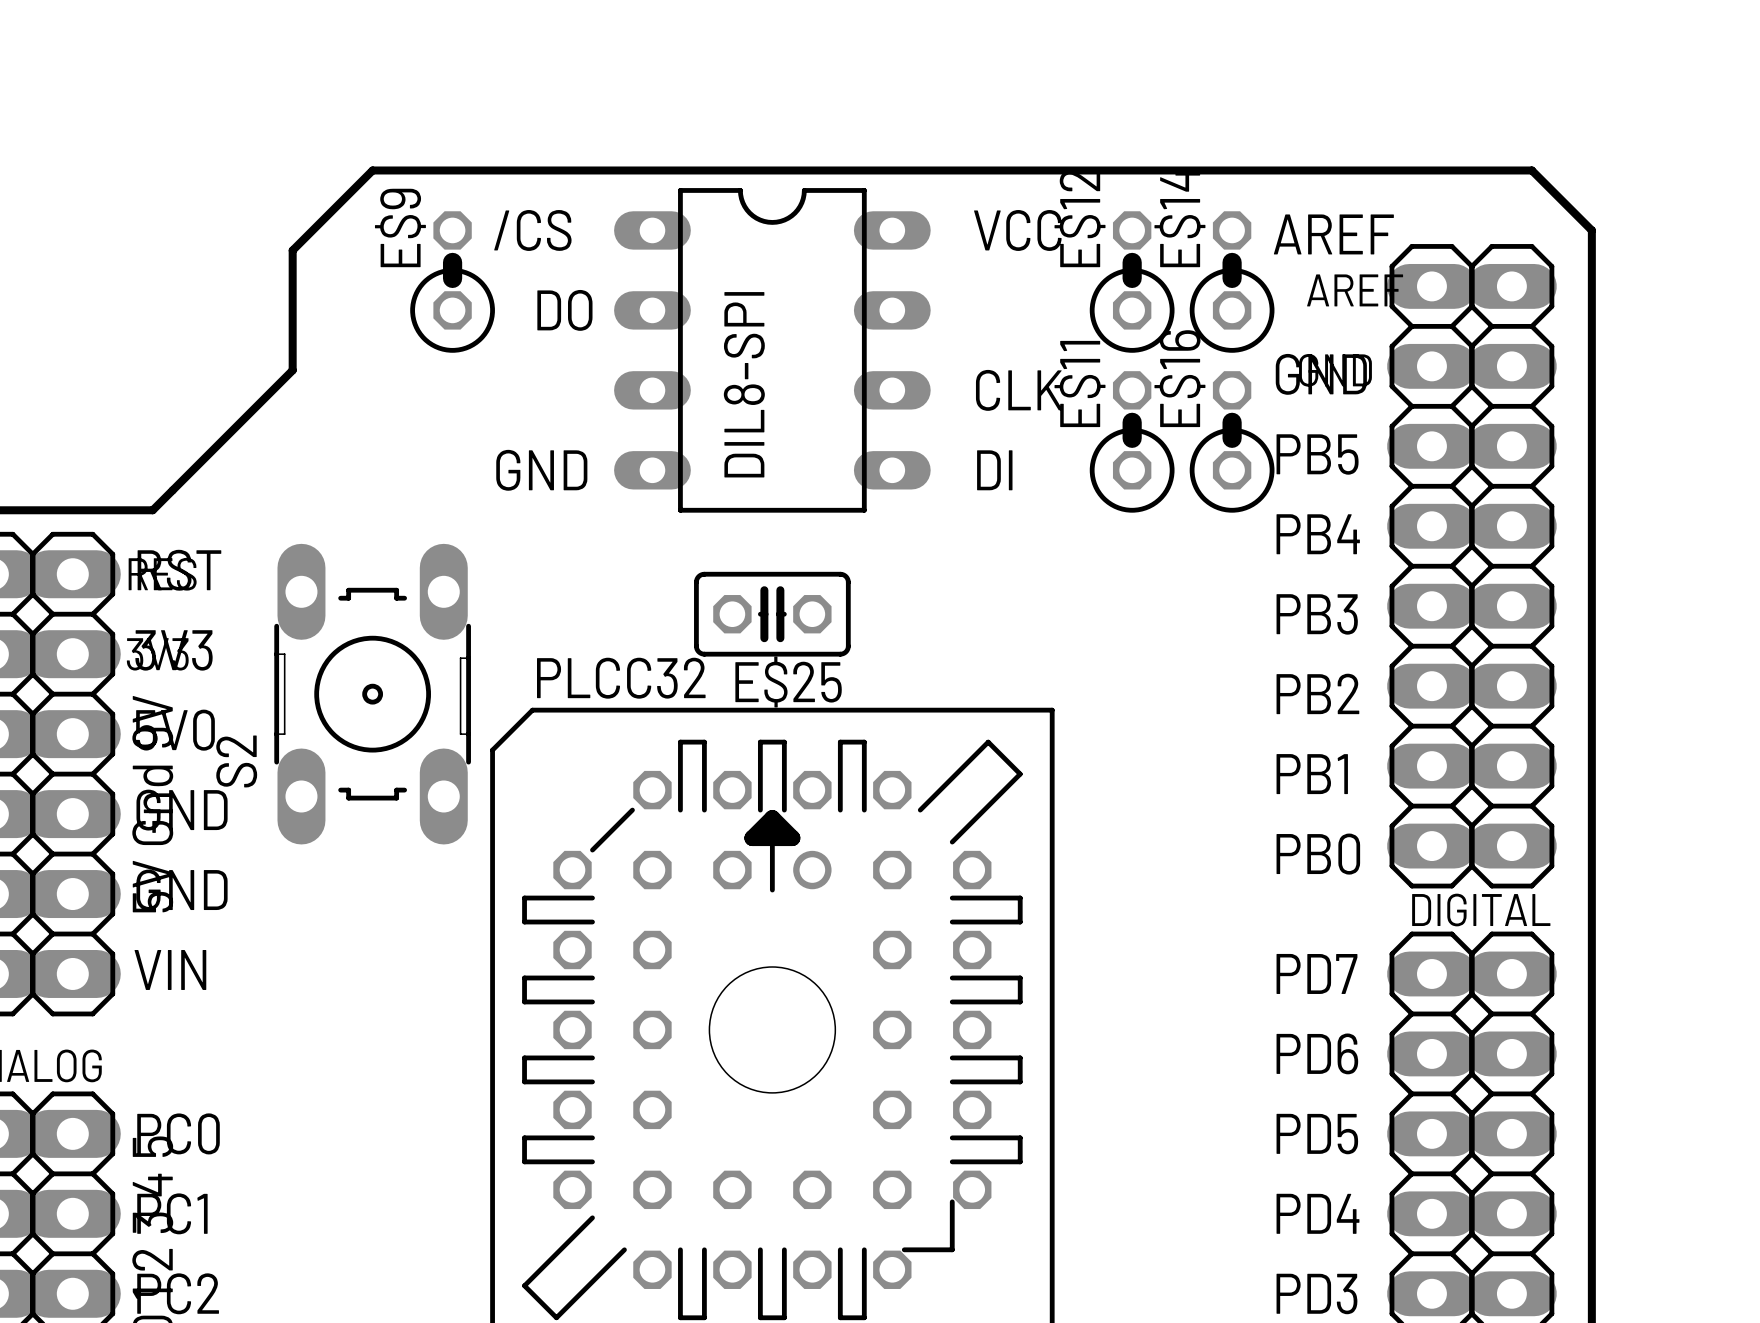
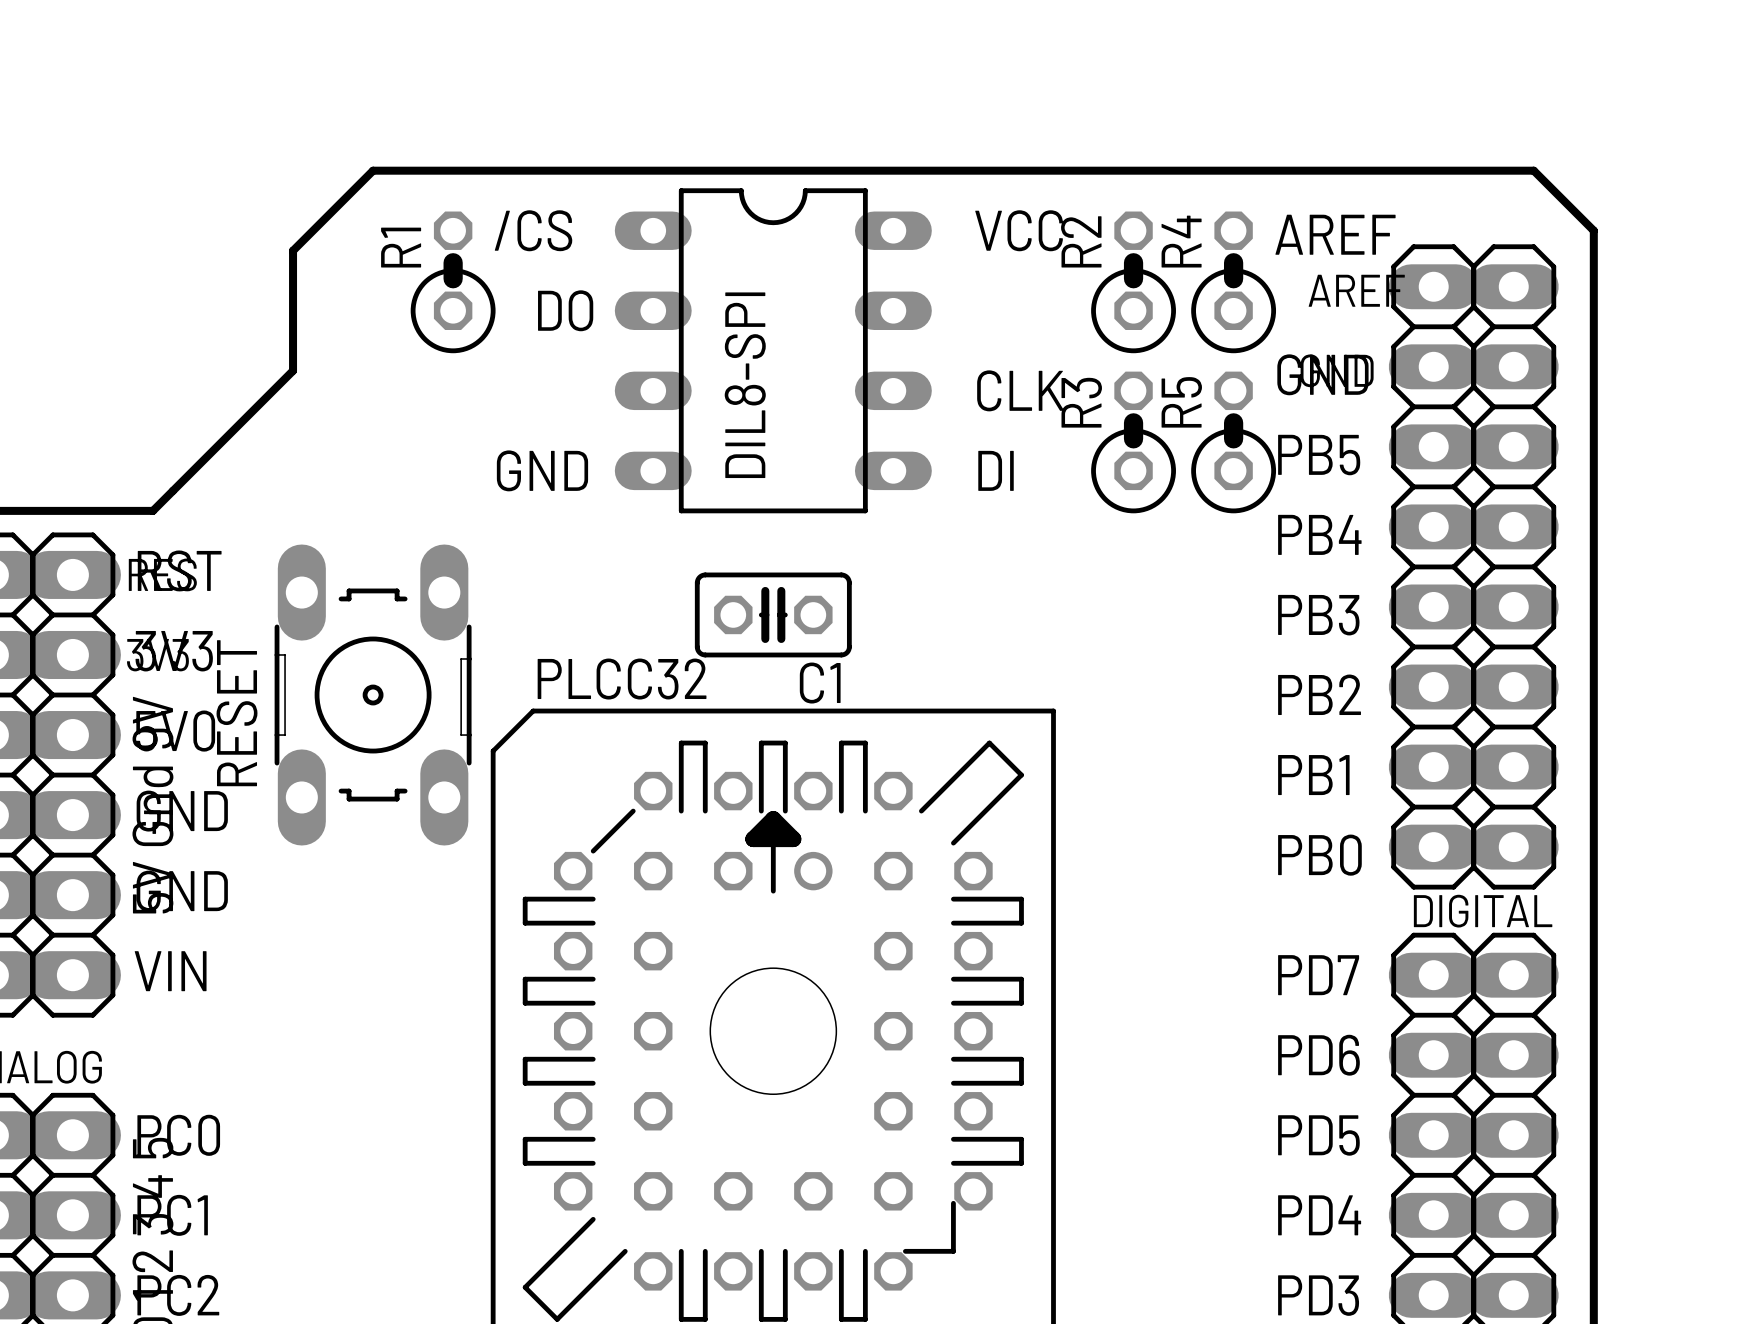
E$12 name: E$12 (1080, 218) -> R2 (1081, 241)
E$14 name: E$14 (1179, 218) -> R4 (1181, 241)
E$9 name: E$9 (400, 227) -> R1 (401, 247)
E$16 name: E$16 (1179, 378) -> R5 (1181, 402)
E$11 name: E$11 (1080, 383) -> R3 (1081, 402)
E$25 name: E$25 (788, 681) -> C1 (820, 683)
S2 name: S2 (236, 761) -> RESET (237, 713)

